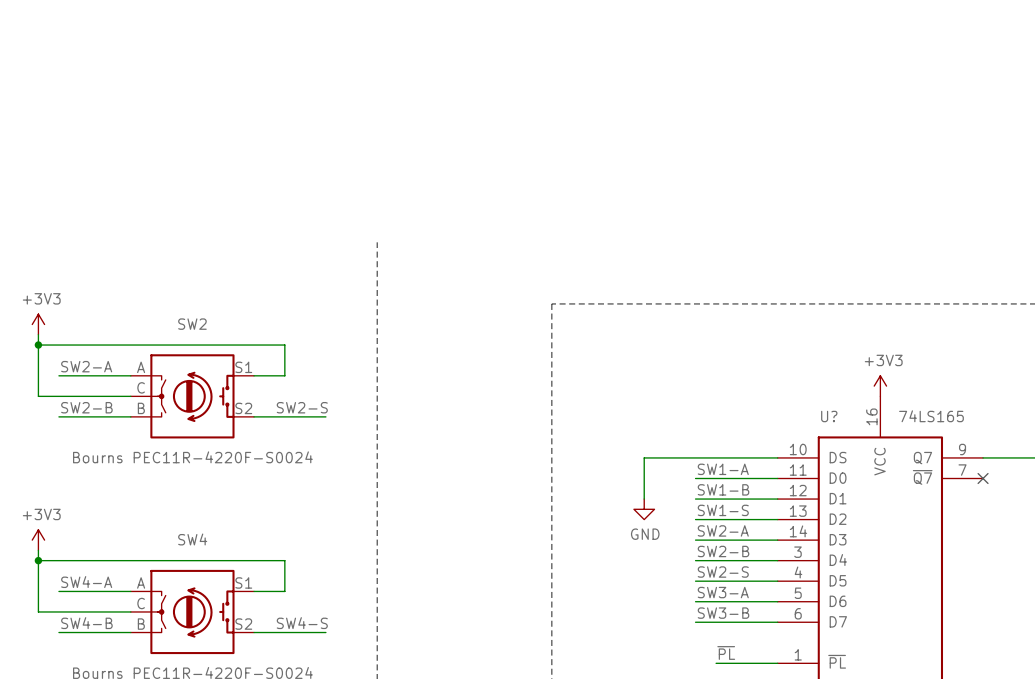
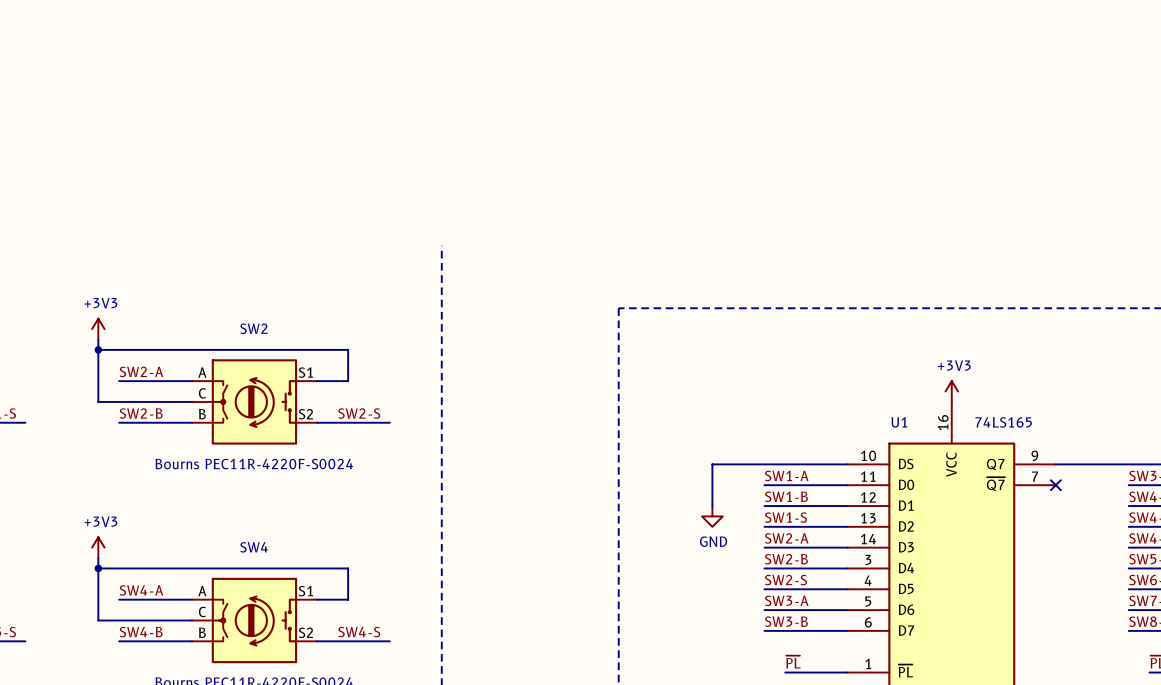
U? name: U? (829, 416) -> U1 (899, 422)

